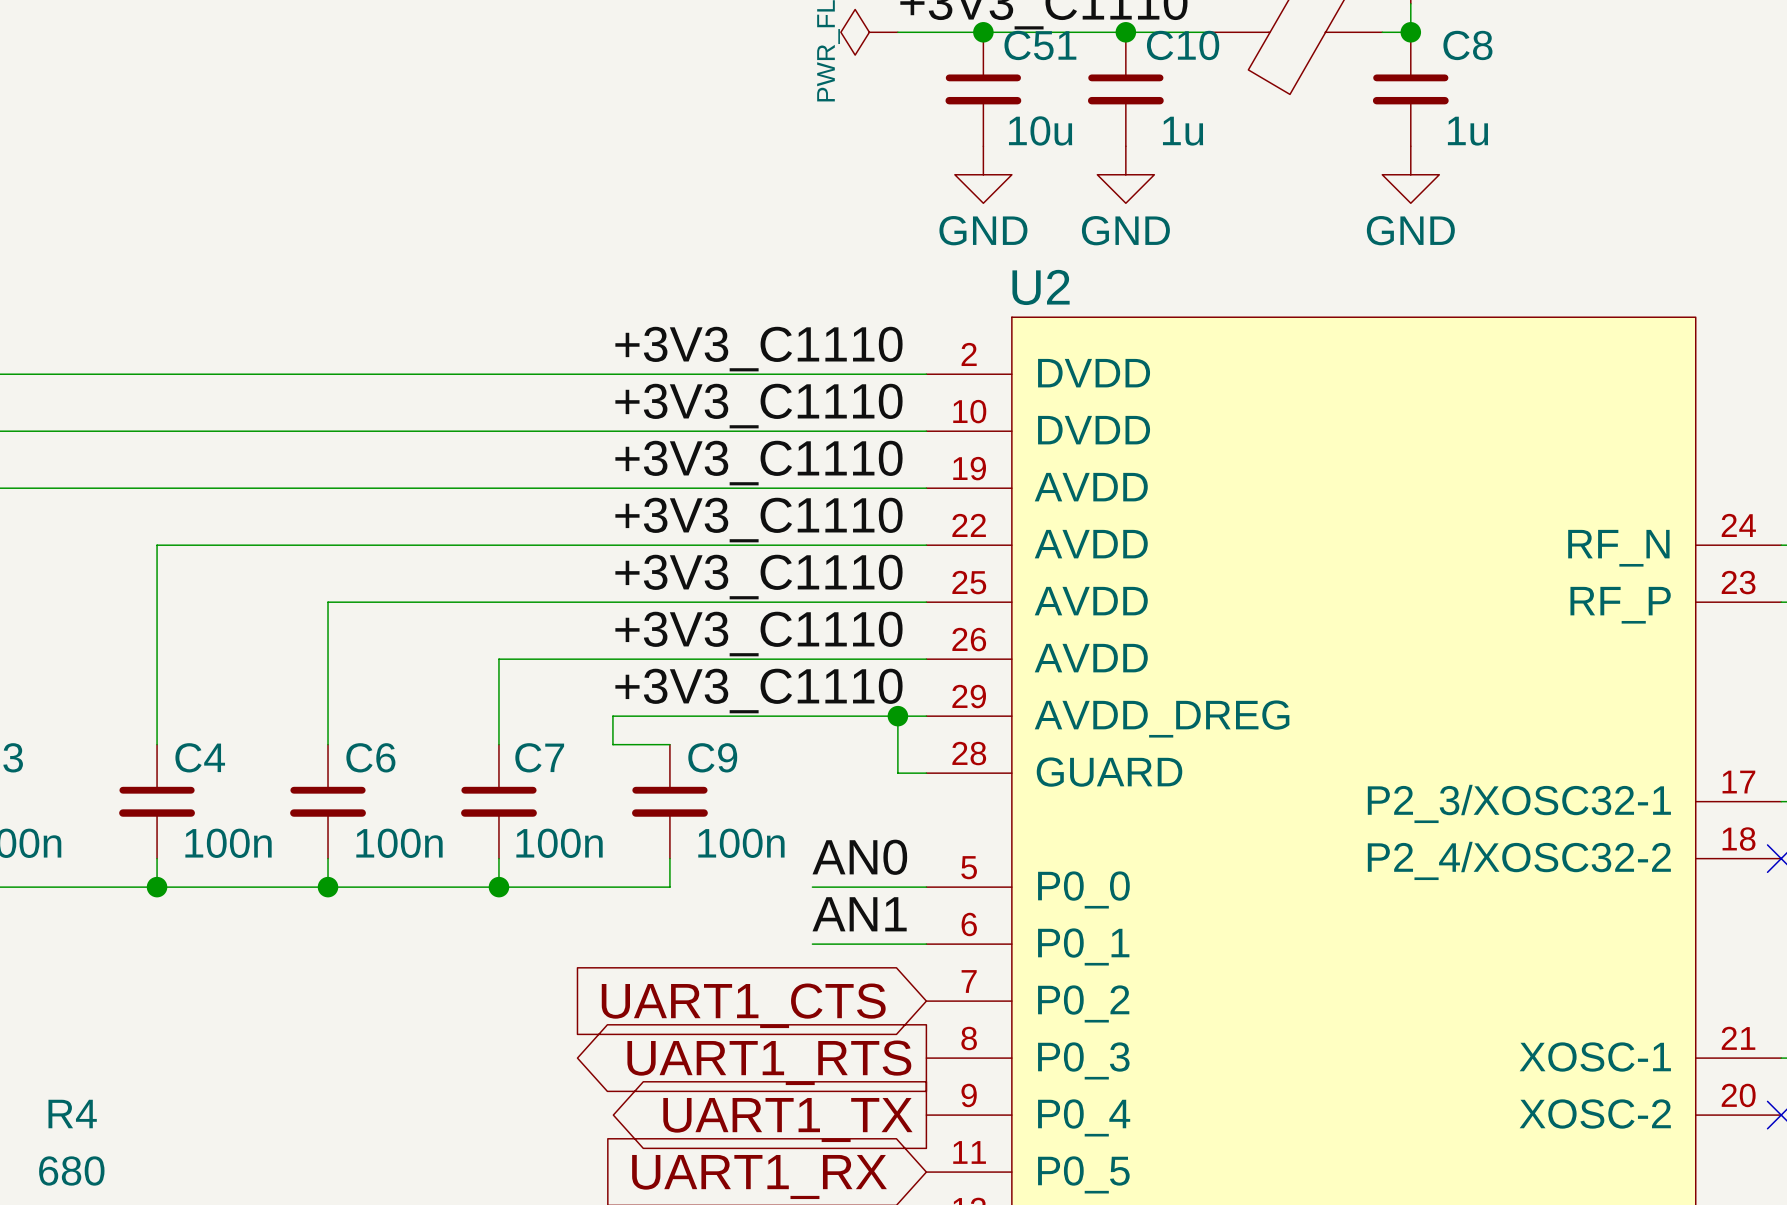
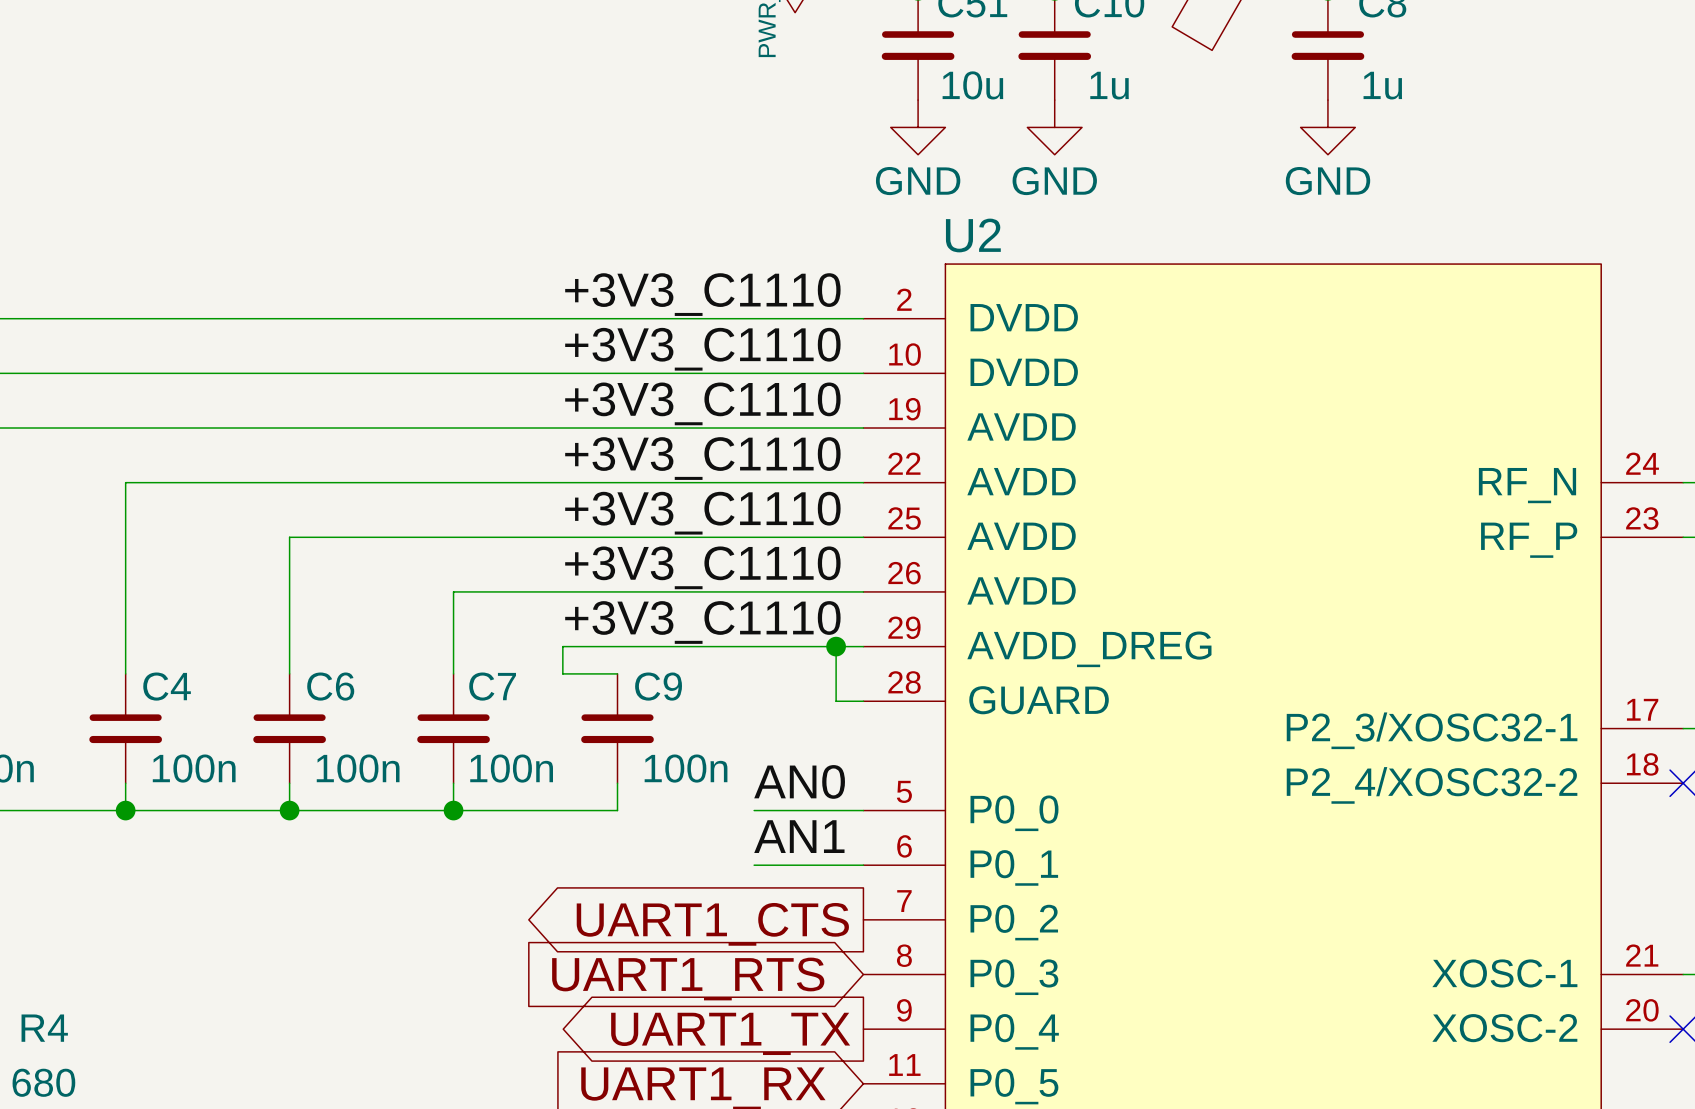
global label shape: input (743, 1005) -> output (712, 924)
global label shape: output (769, 1062) -> input (688, 978)

